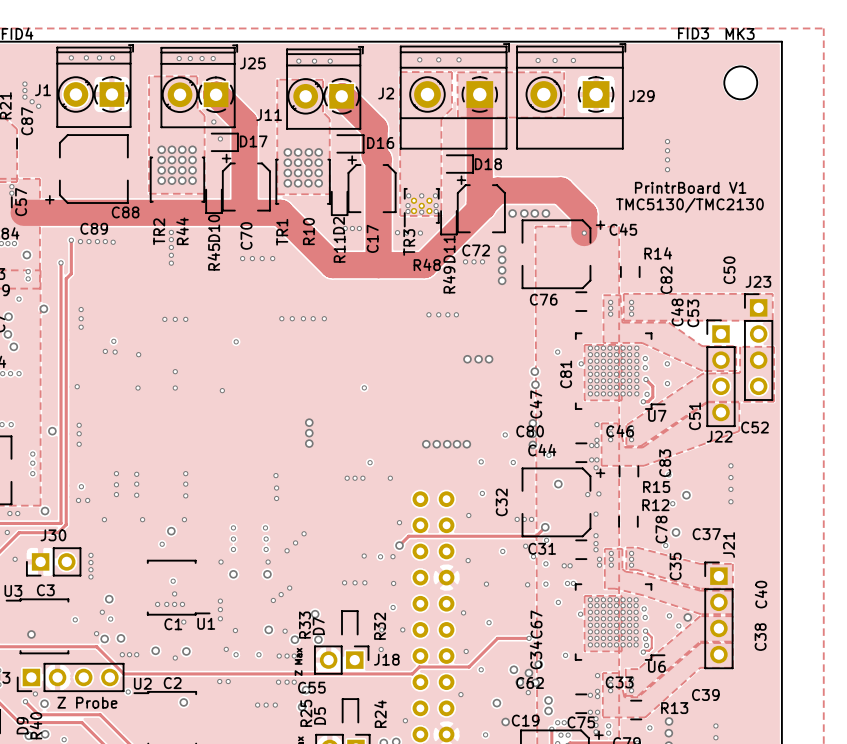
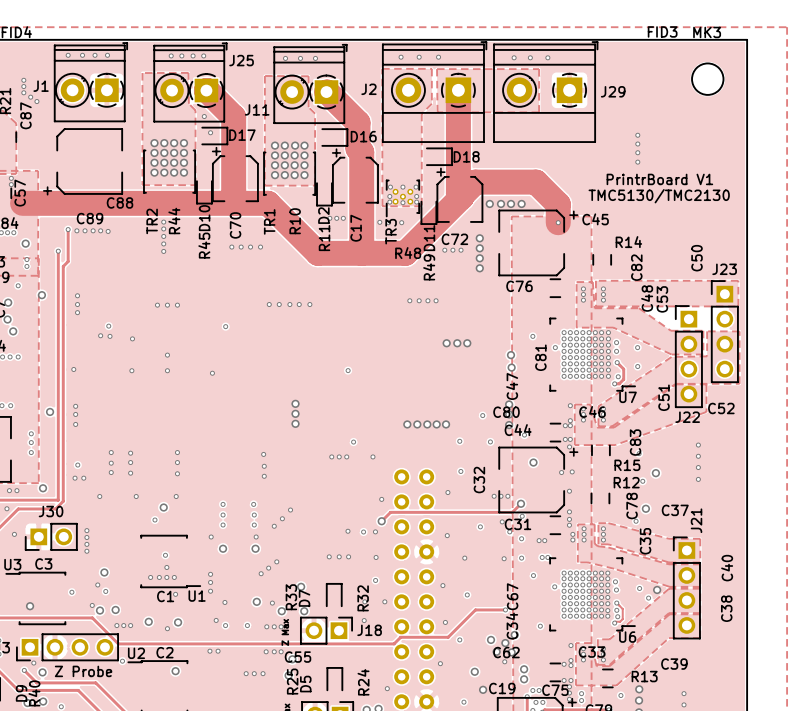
zone outline: (584, 344) (584, 400) (621, 400) (621, 344) (584, 344) -> none
zone outline: (584, 595) (584, 651) (621, 651) (621, 595) (584, 595) -> none

